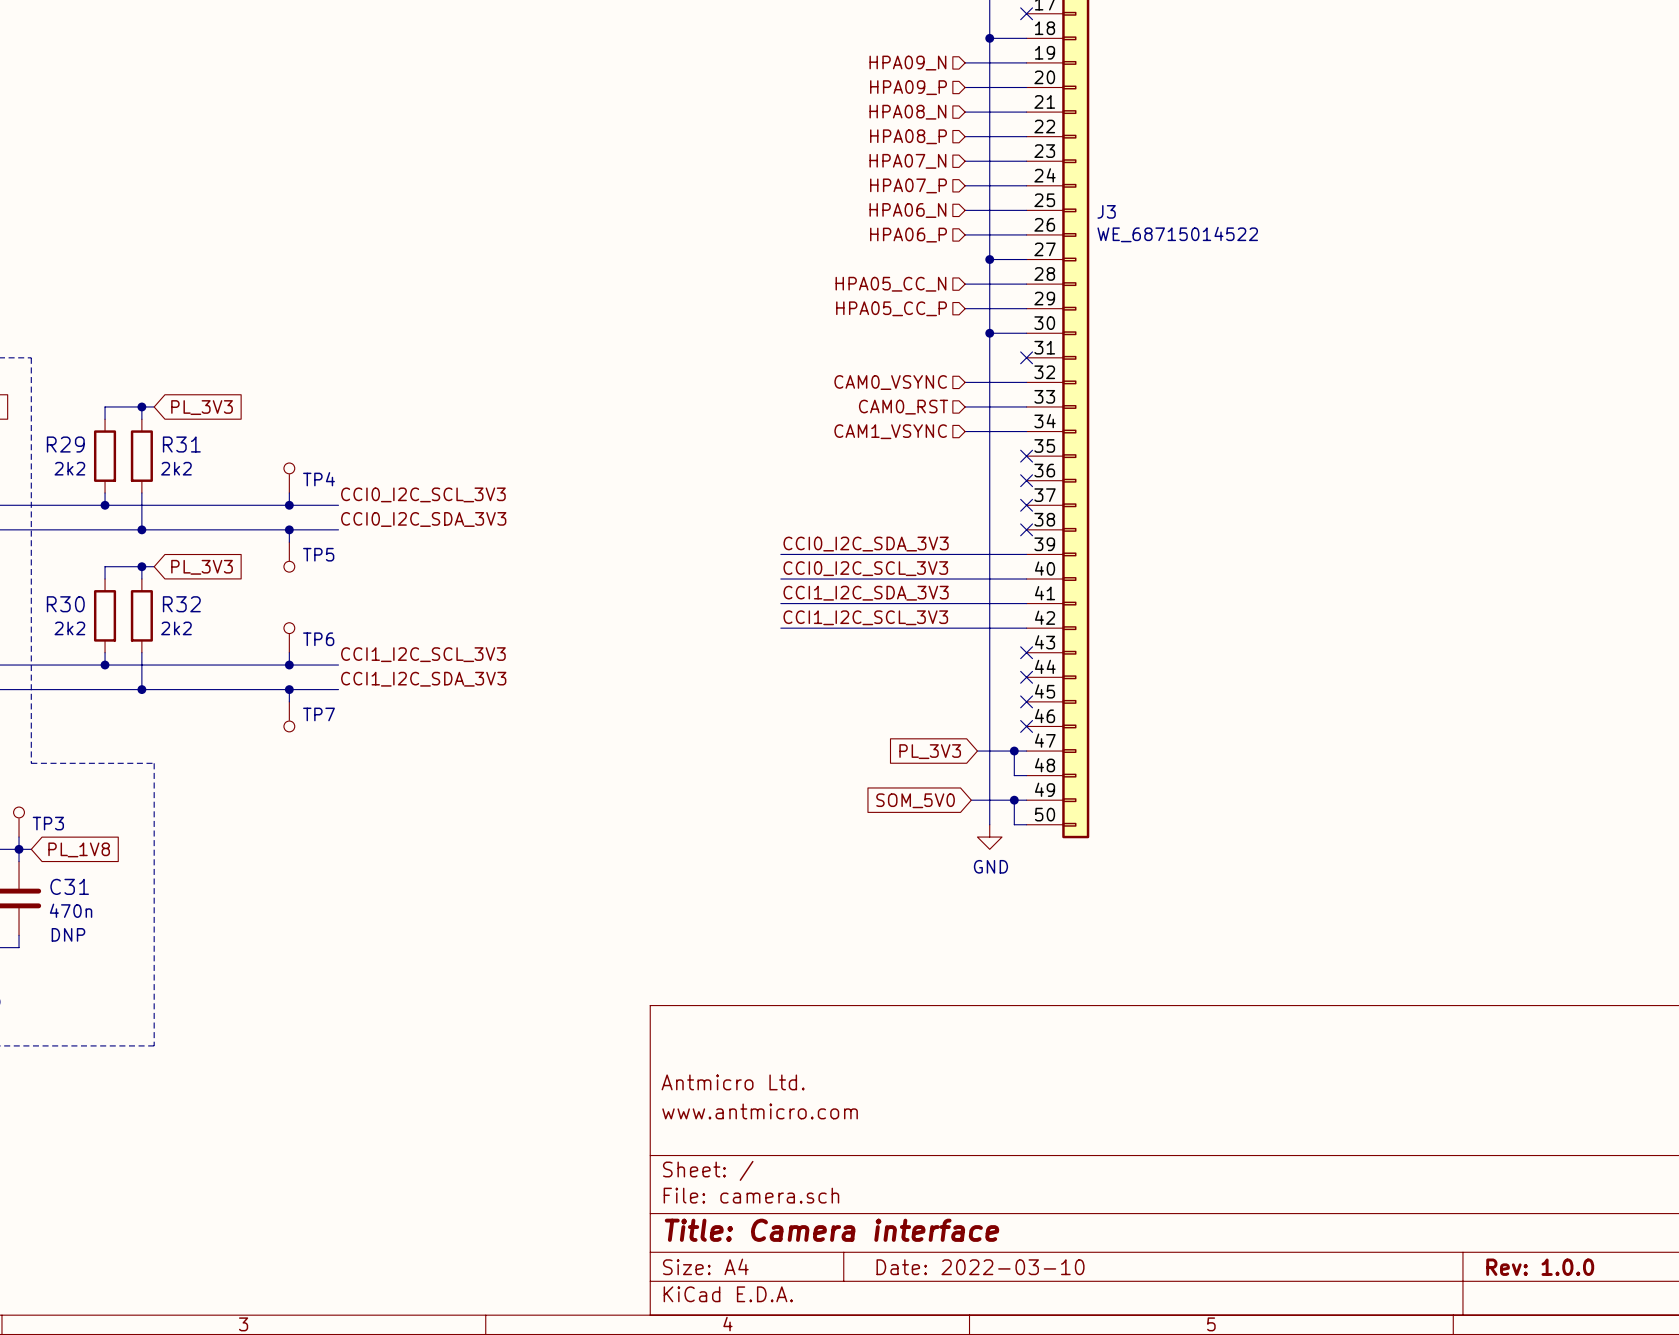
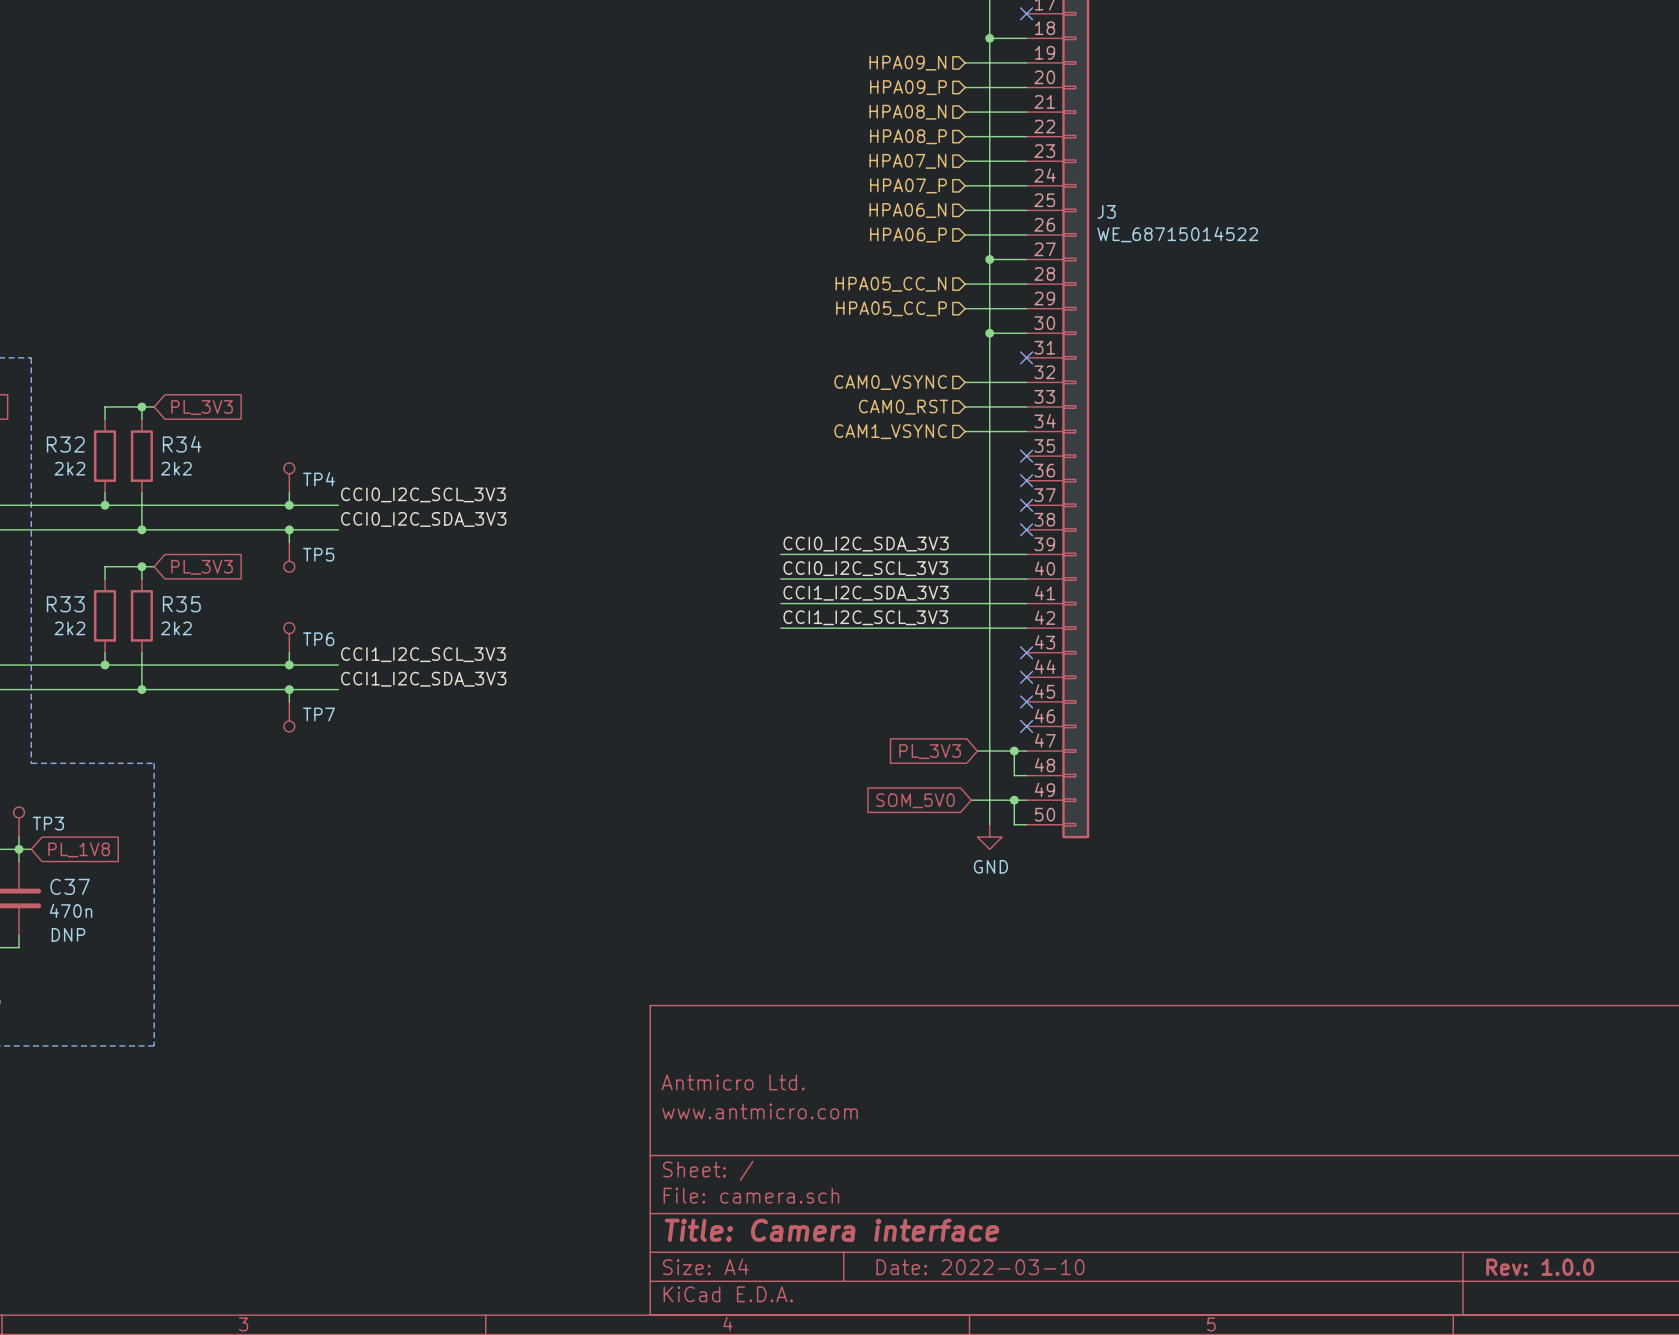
R29 name: R29 (65, 444) -> R32 (65, 444)
R31 name: R31 (181, 444) -> R34 (182, 444)
R30 name: R30 (65, 604) -> R33 (65, 604)
R32 name: R32 (181, 604) -> R35 (181, 604)
C31 name: C31 (69, 886) -> C37 (70, 886)

